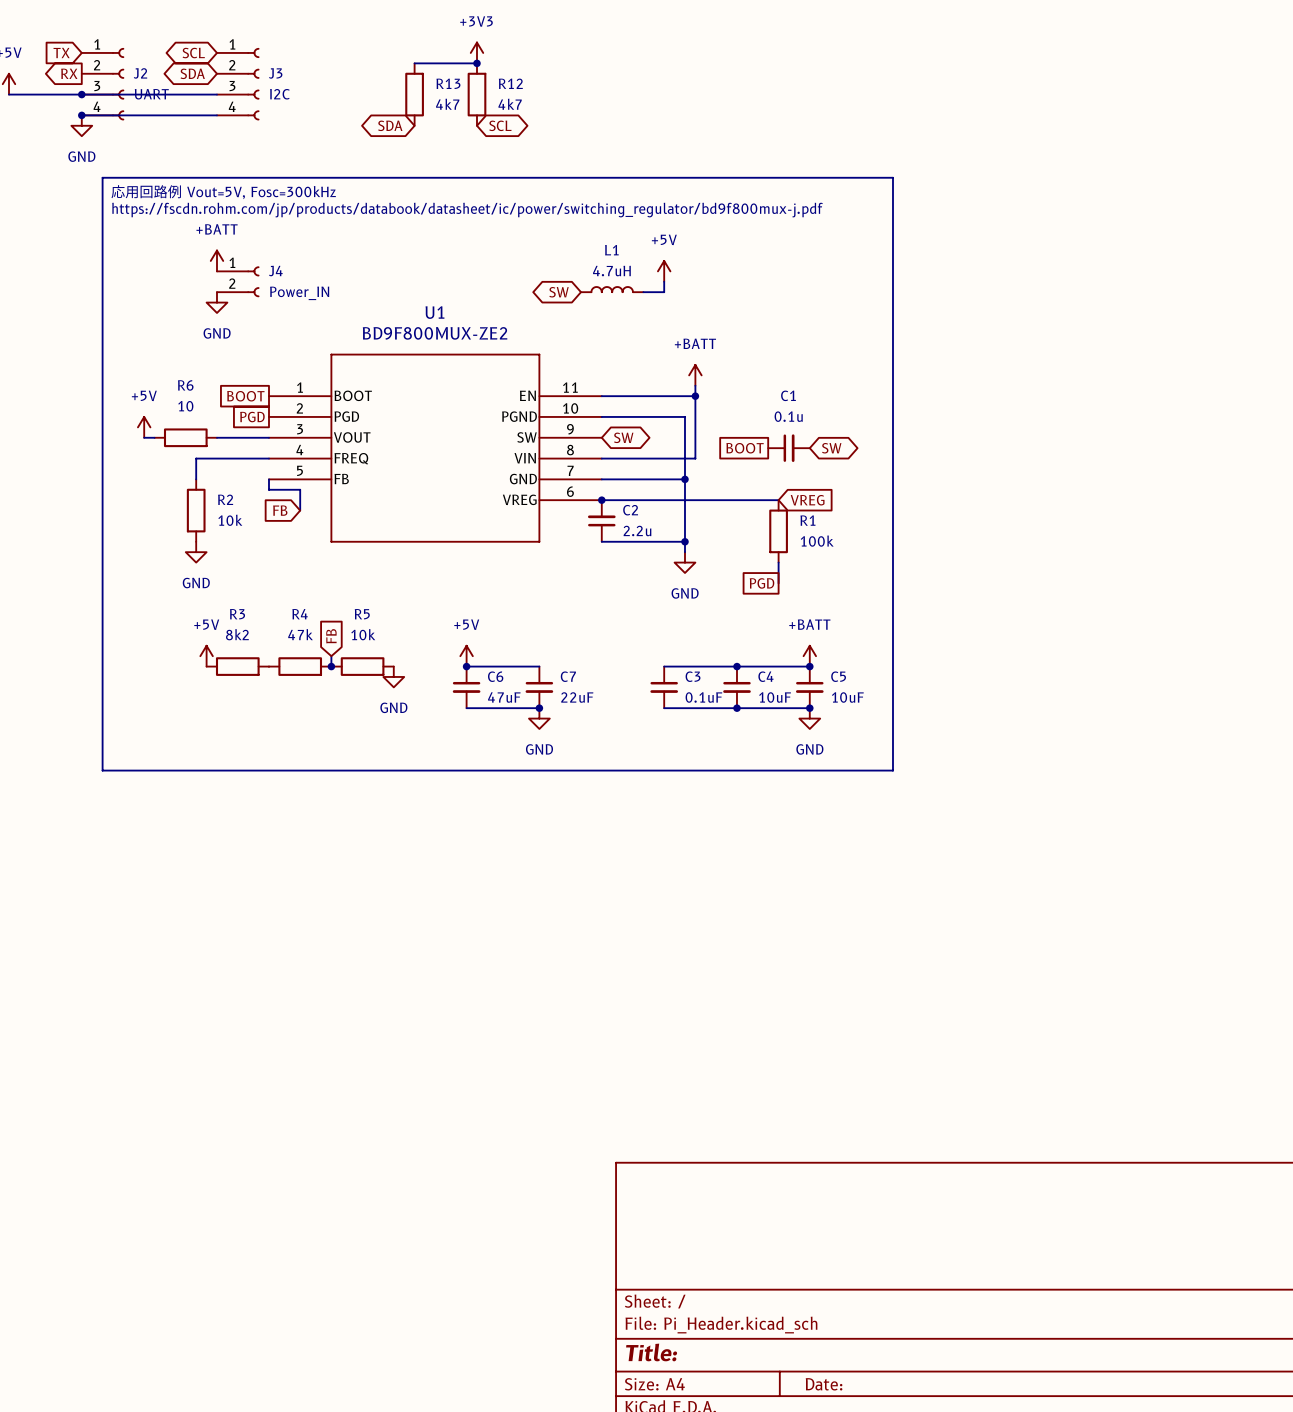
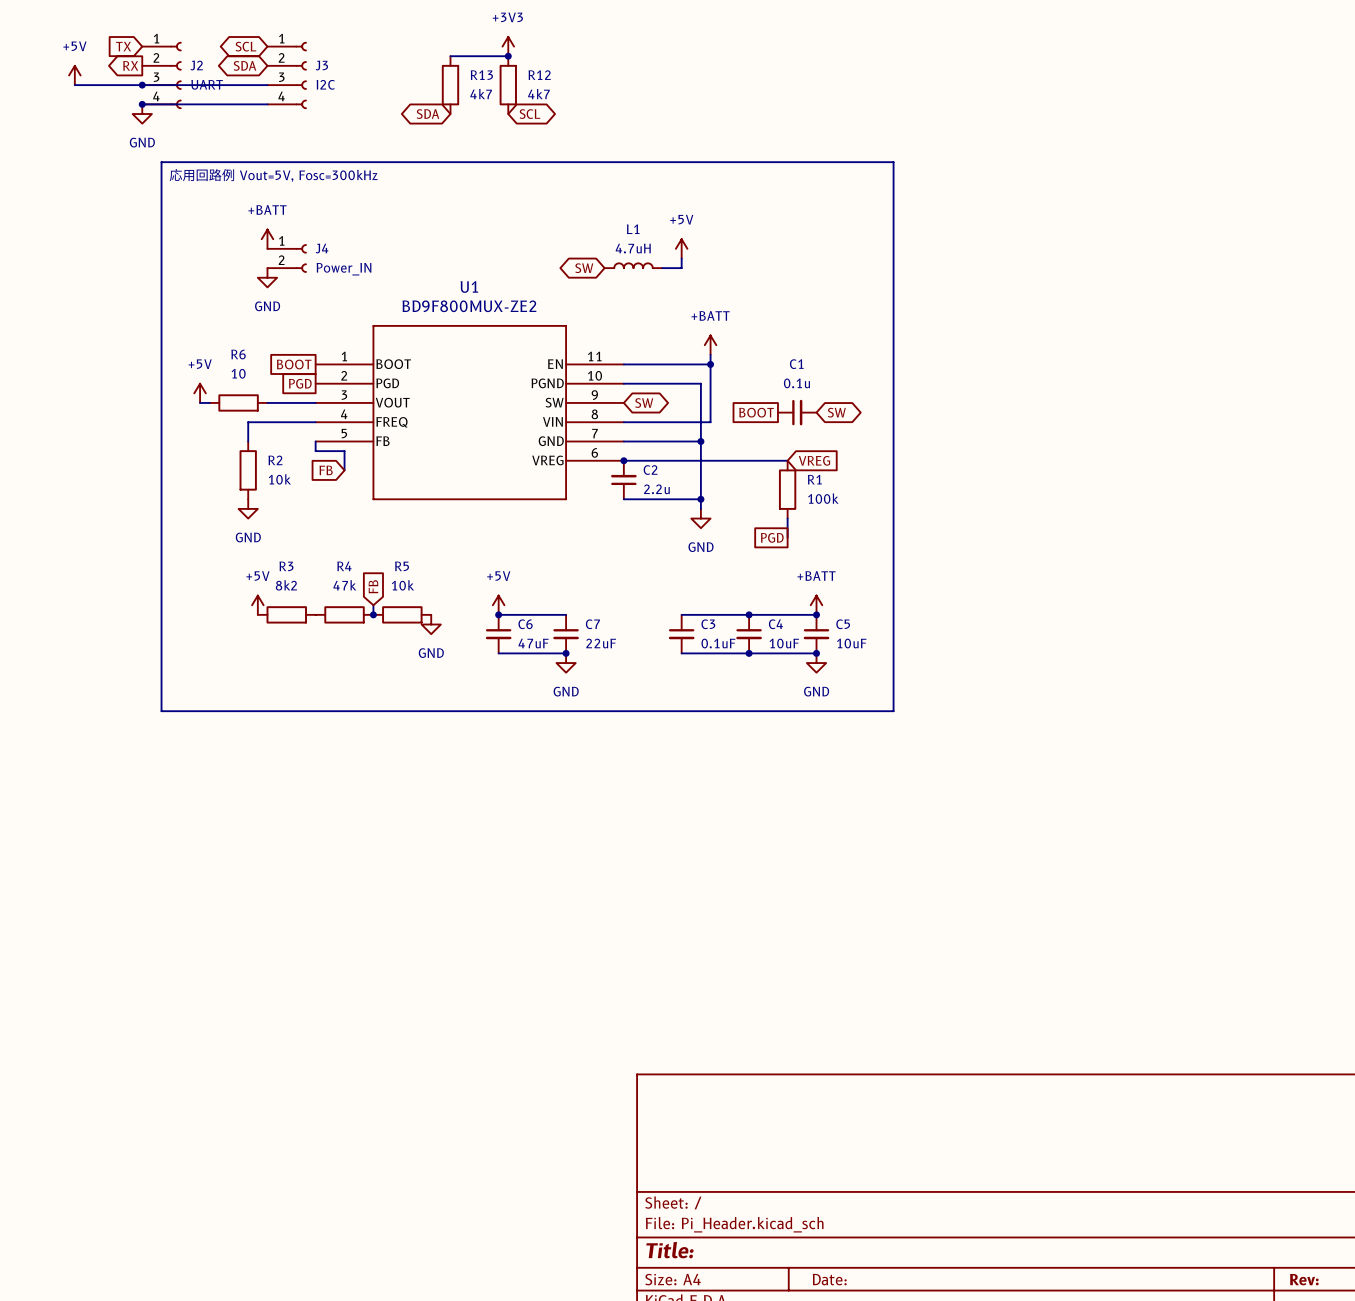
text: https://fscdn.rohm.com/jp/products/databook/datasheet/ic/power/switching_regulator/bd9f800mux-j.pdf (467, 210) -> none

